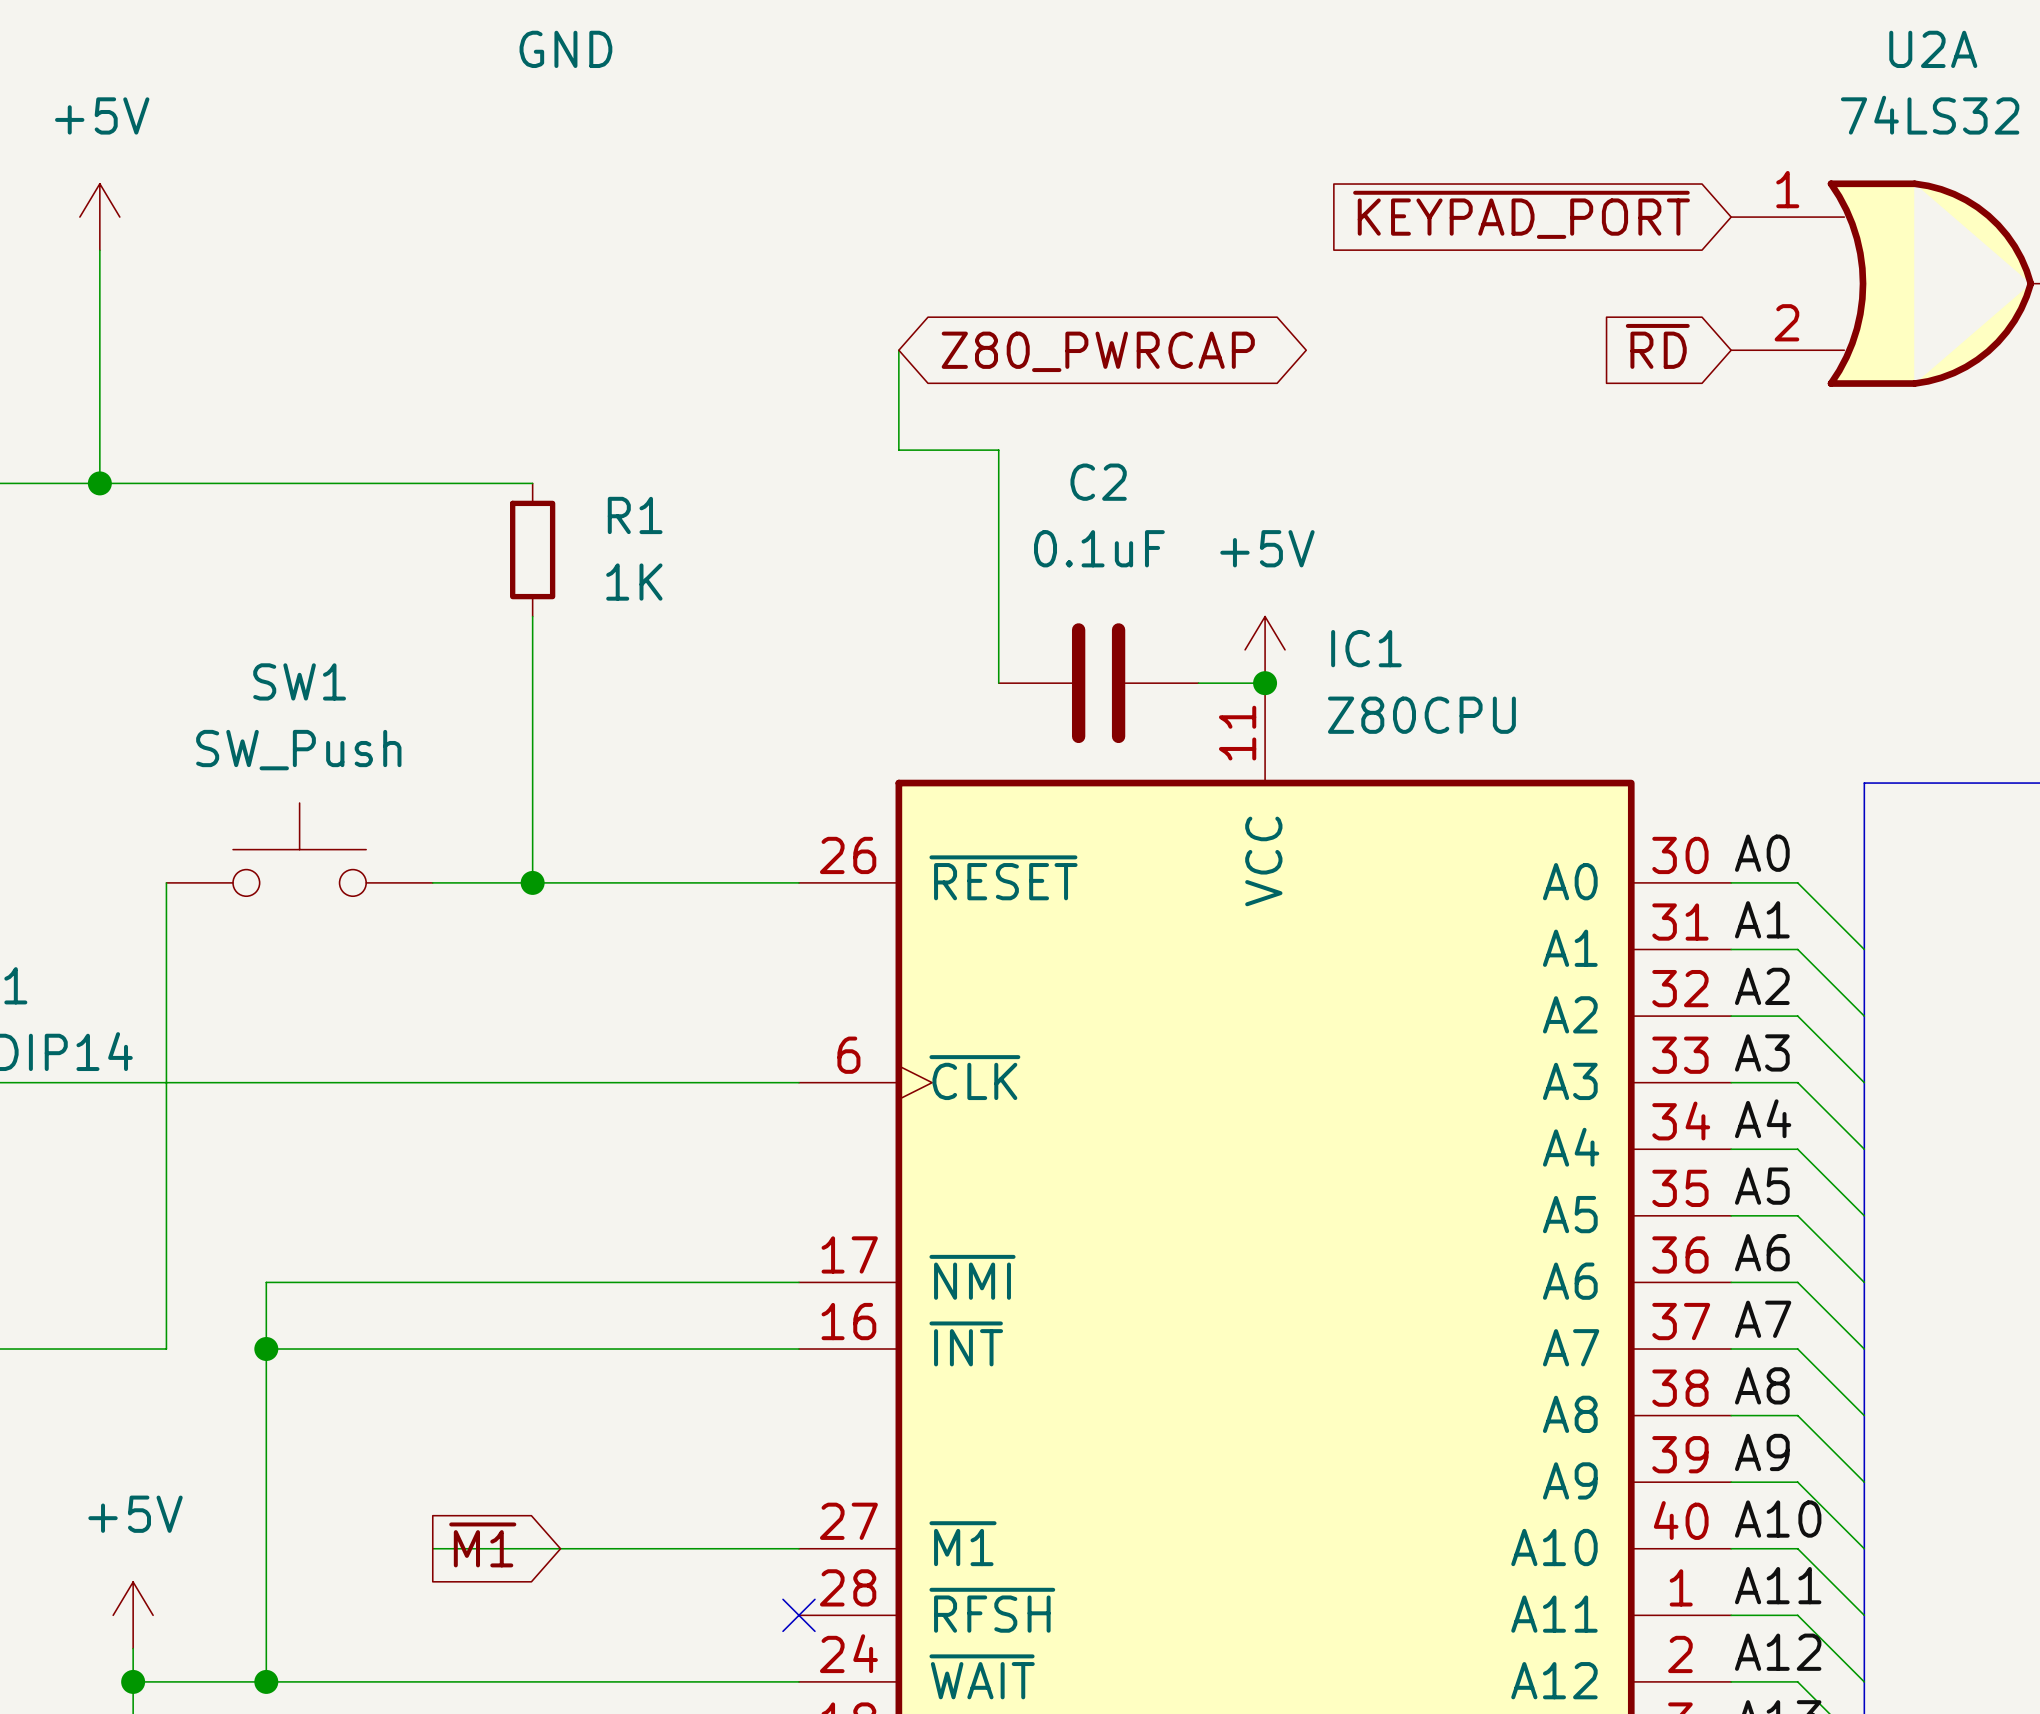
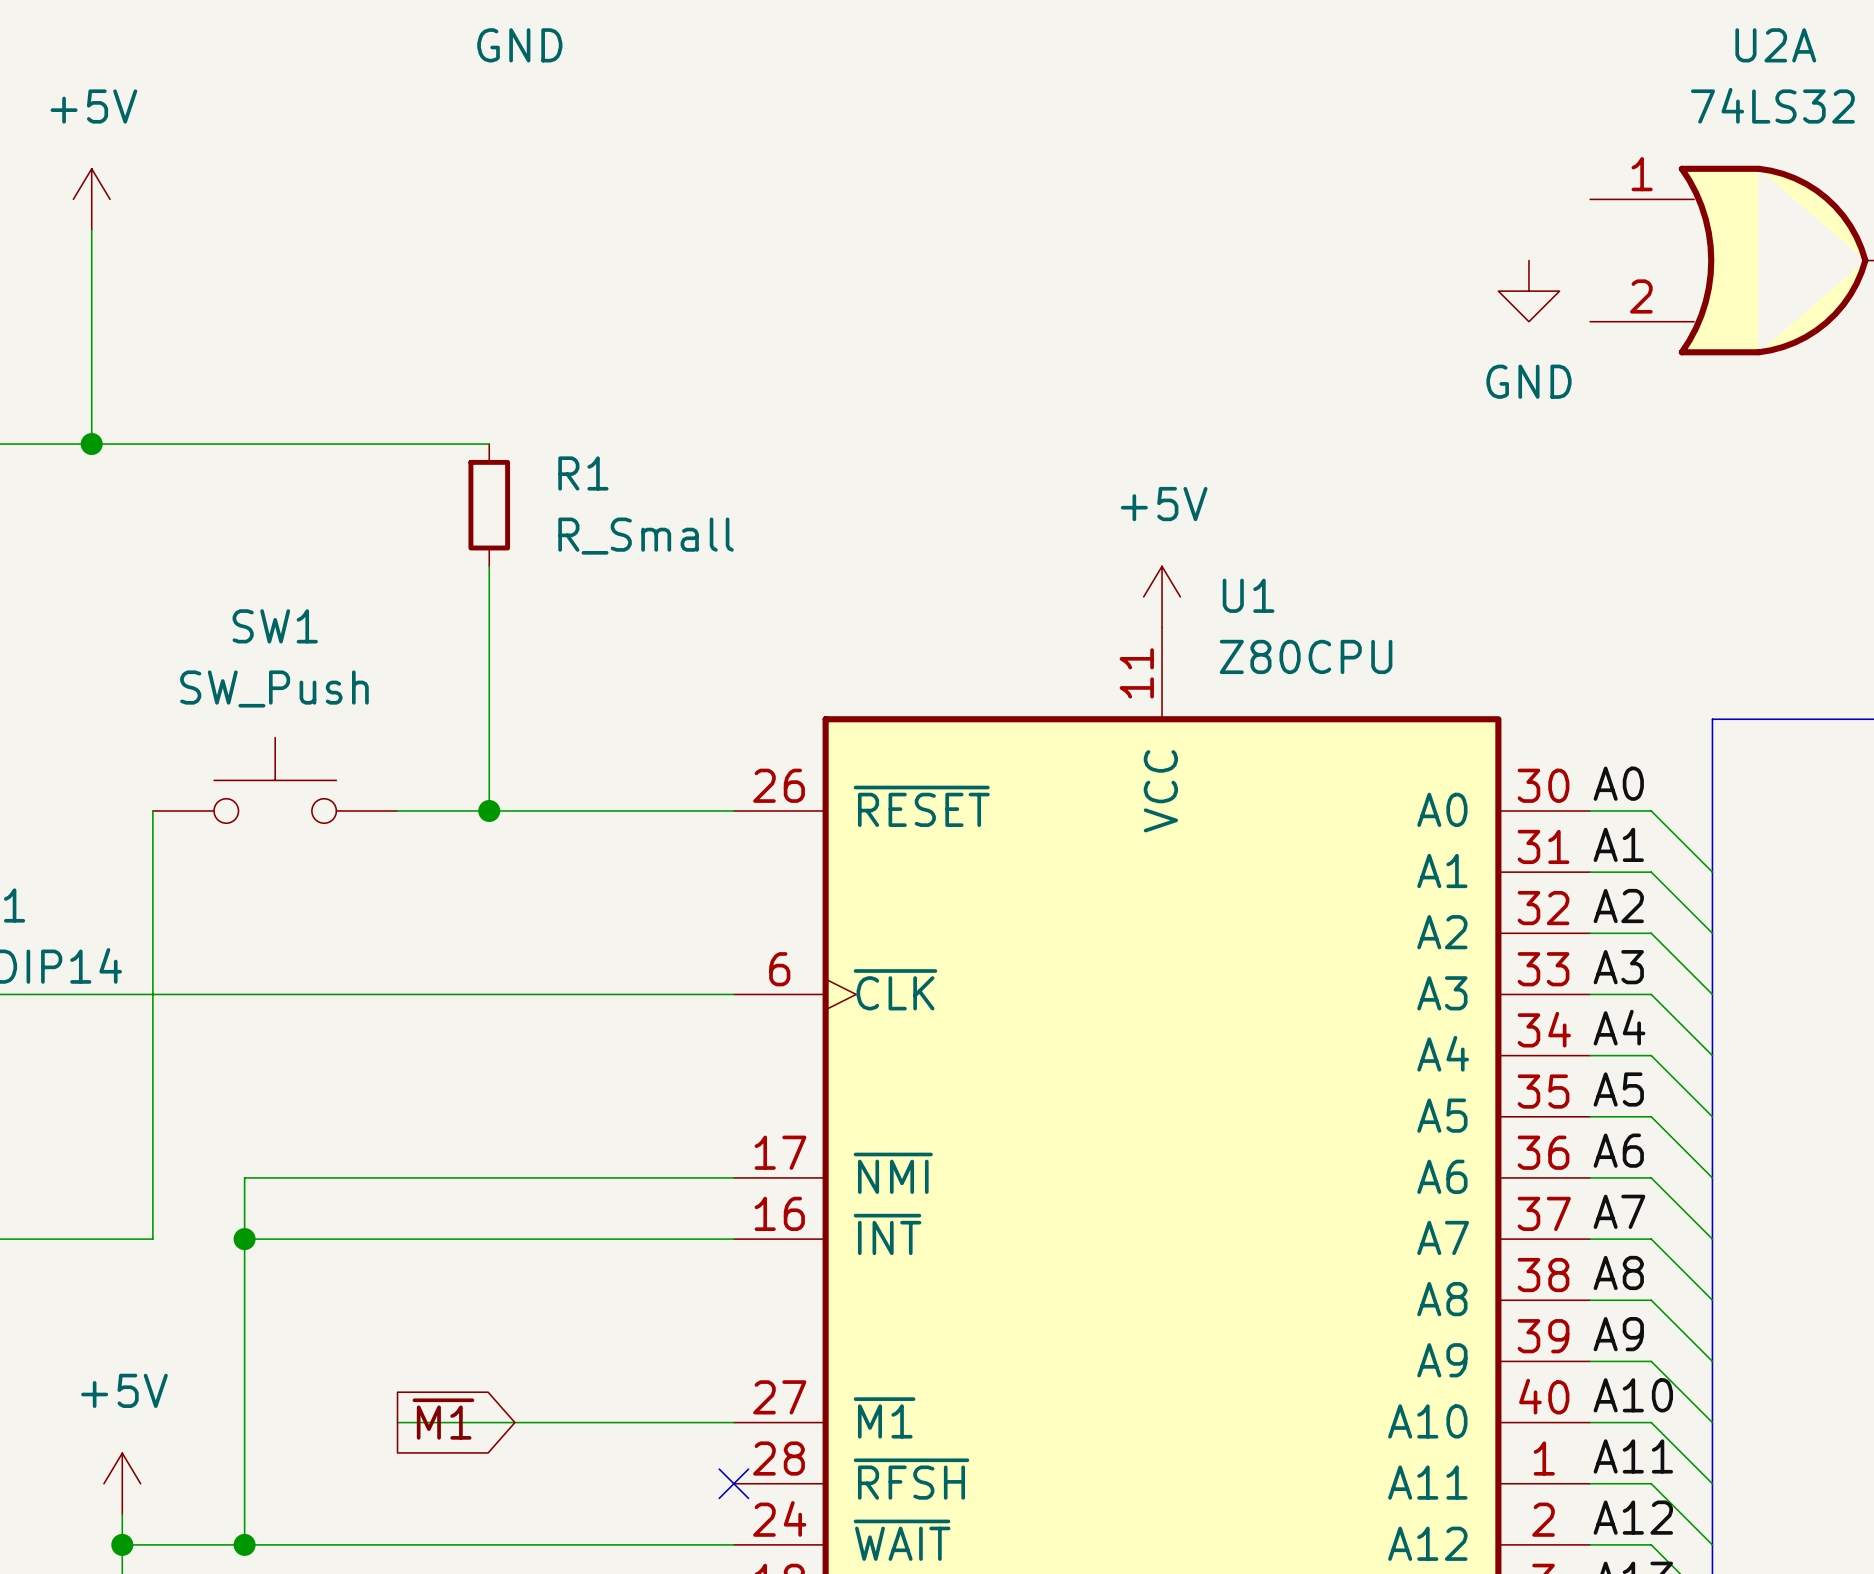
global label: ~{KEYPAD_PORT} (1521, 214) -> none
power symbol: none -> GND (1528, 291)
global label: ~{RD} (1657, 346) -> none
wire: (898, 350) (898, 450) (998, 450) (998, 683) -> none
global label: Z80_PWRCAP (1098, 351) -> none
R1 value: 1K (634, 582) -> R_Small (646, 536)
IC1 name: IC1 (1366, 648) -> U1 (1248, 595)
C2: 0.1uF (1098, 683) -> none
wire: (1198, 683) (1265, 683) -> none
junction: (1265, 683) -> none

